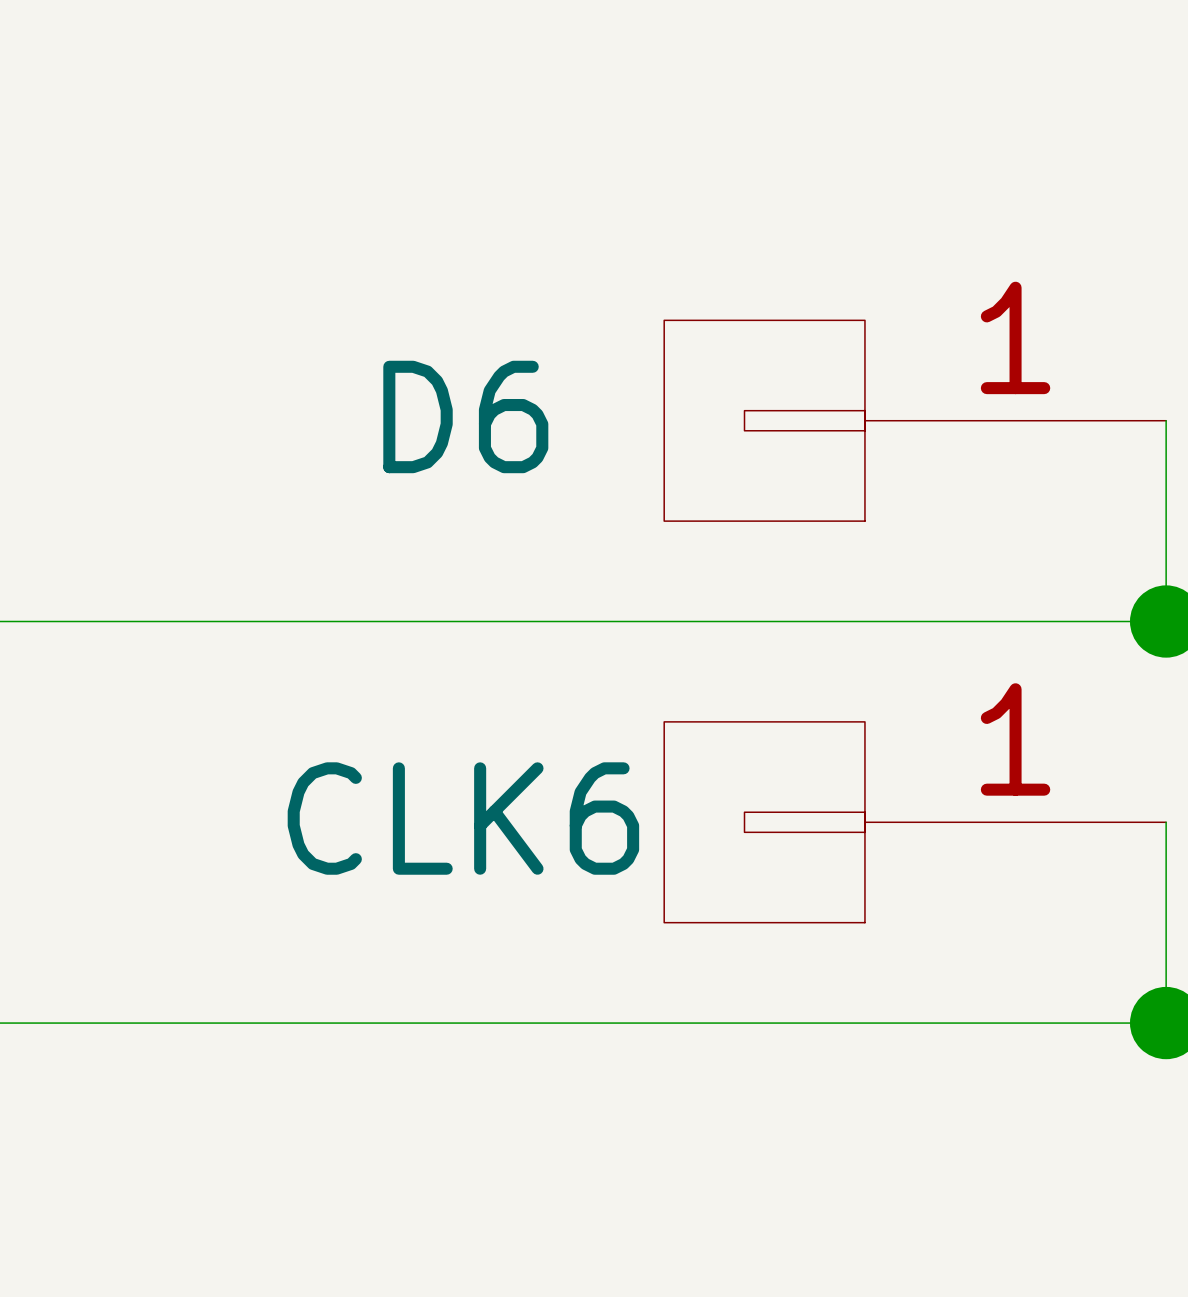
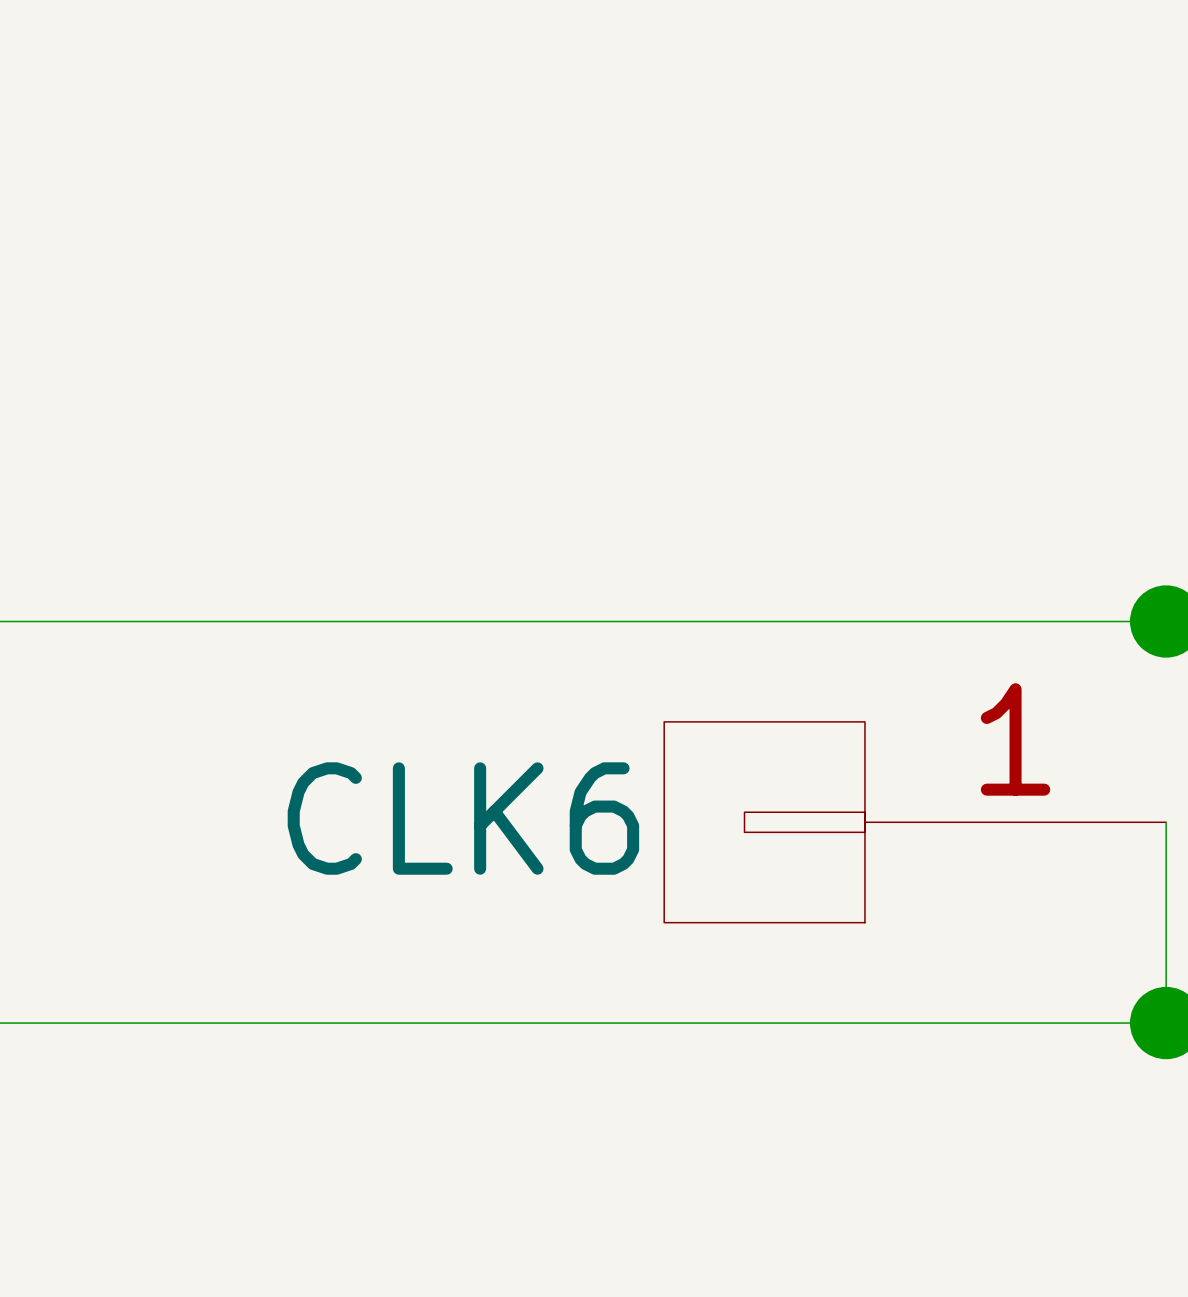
D6: (915, 420) -> none
wire: (1166, 420) (1166, 621) -> none

